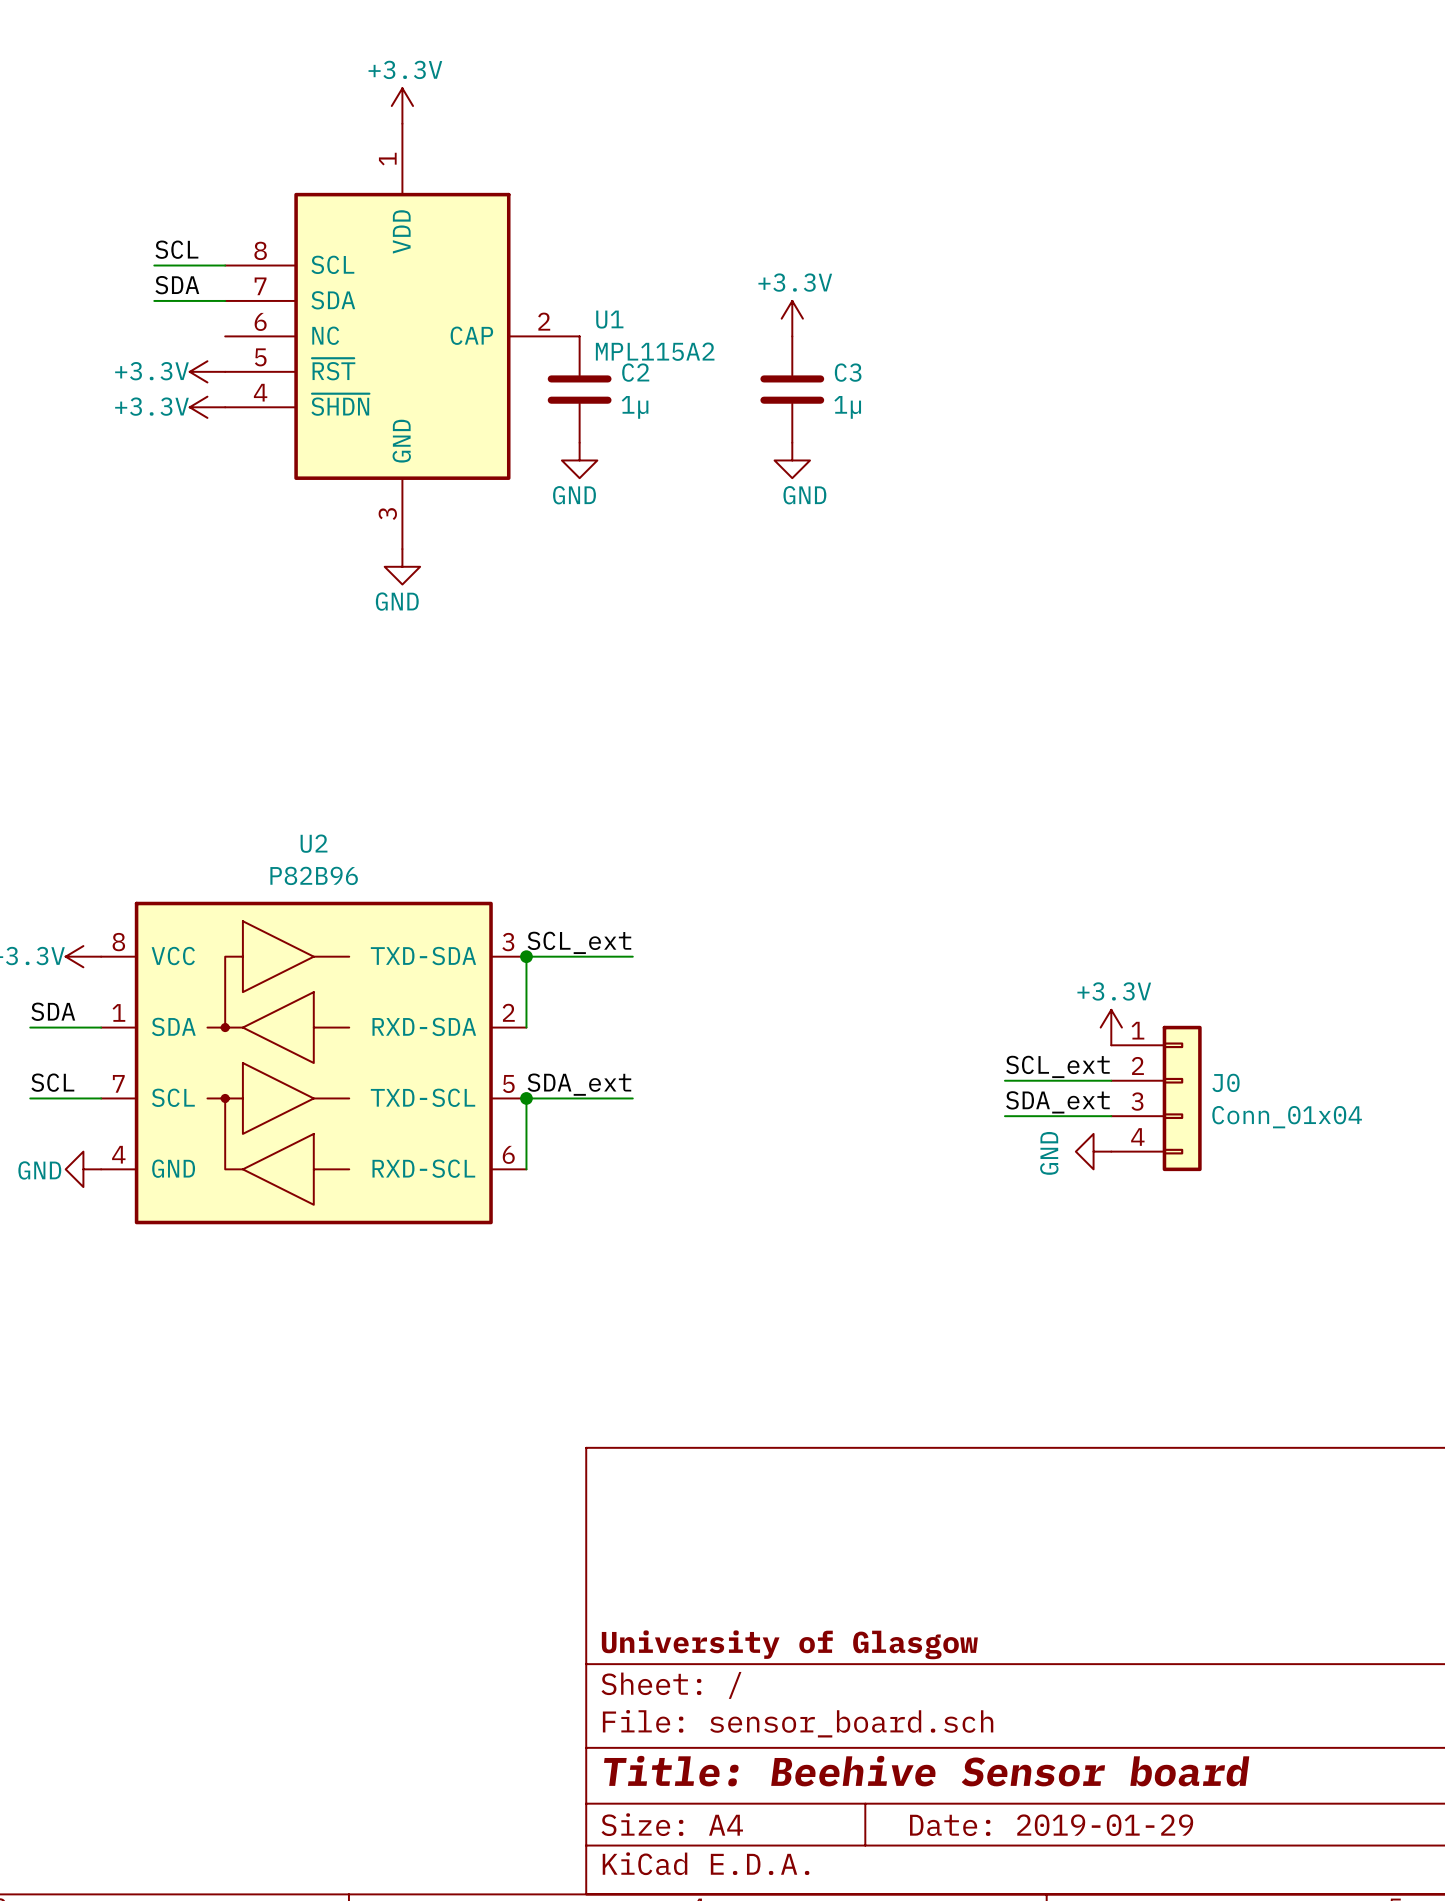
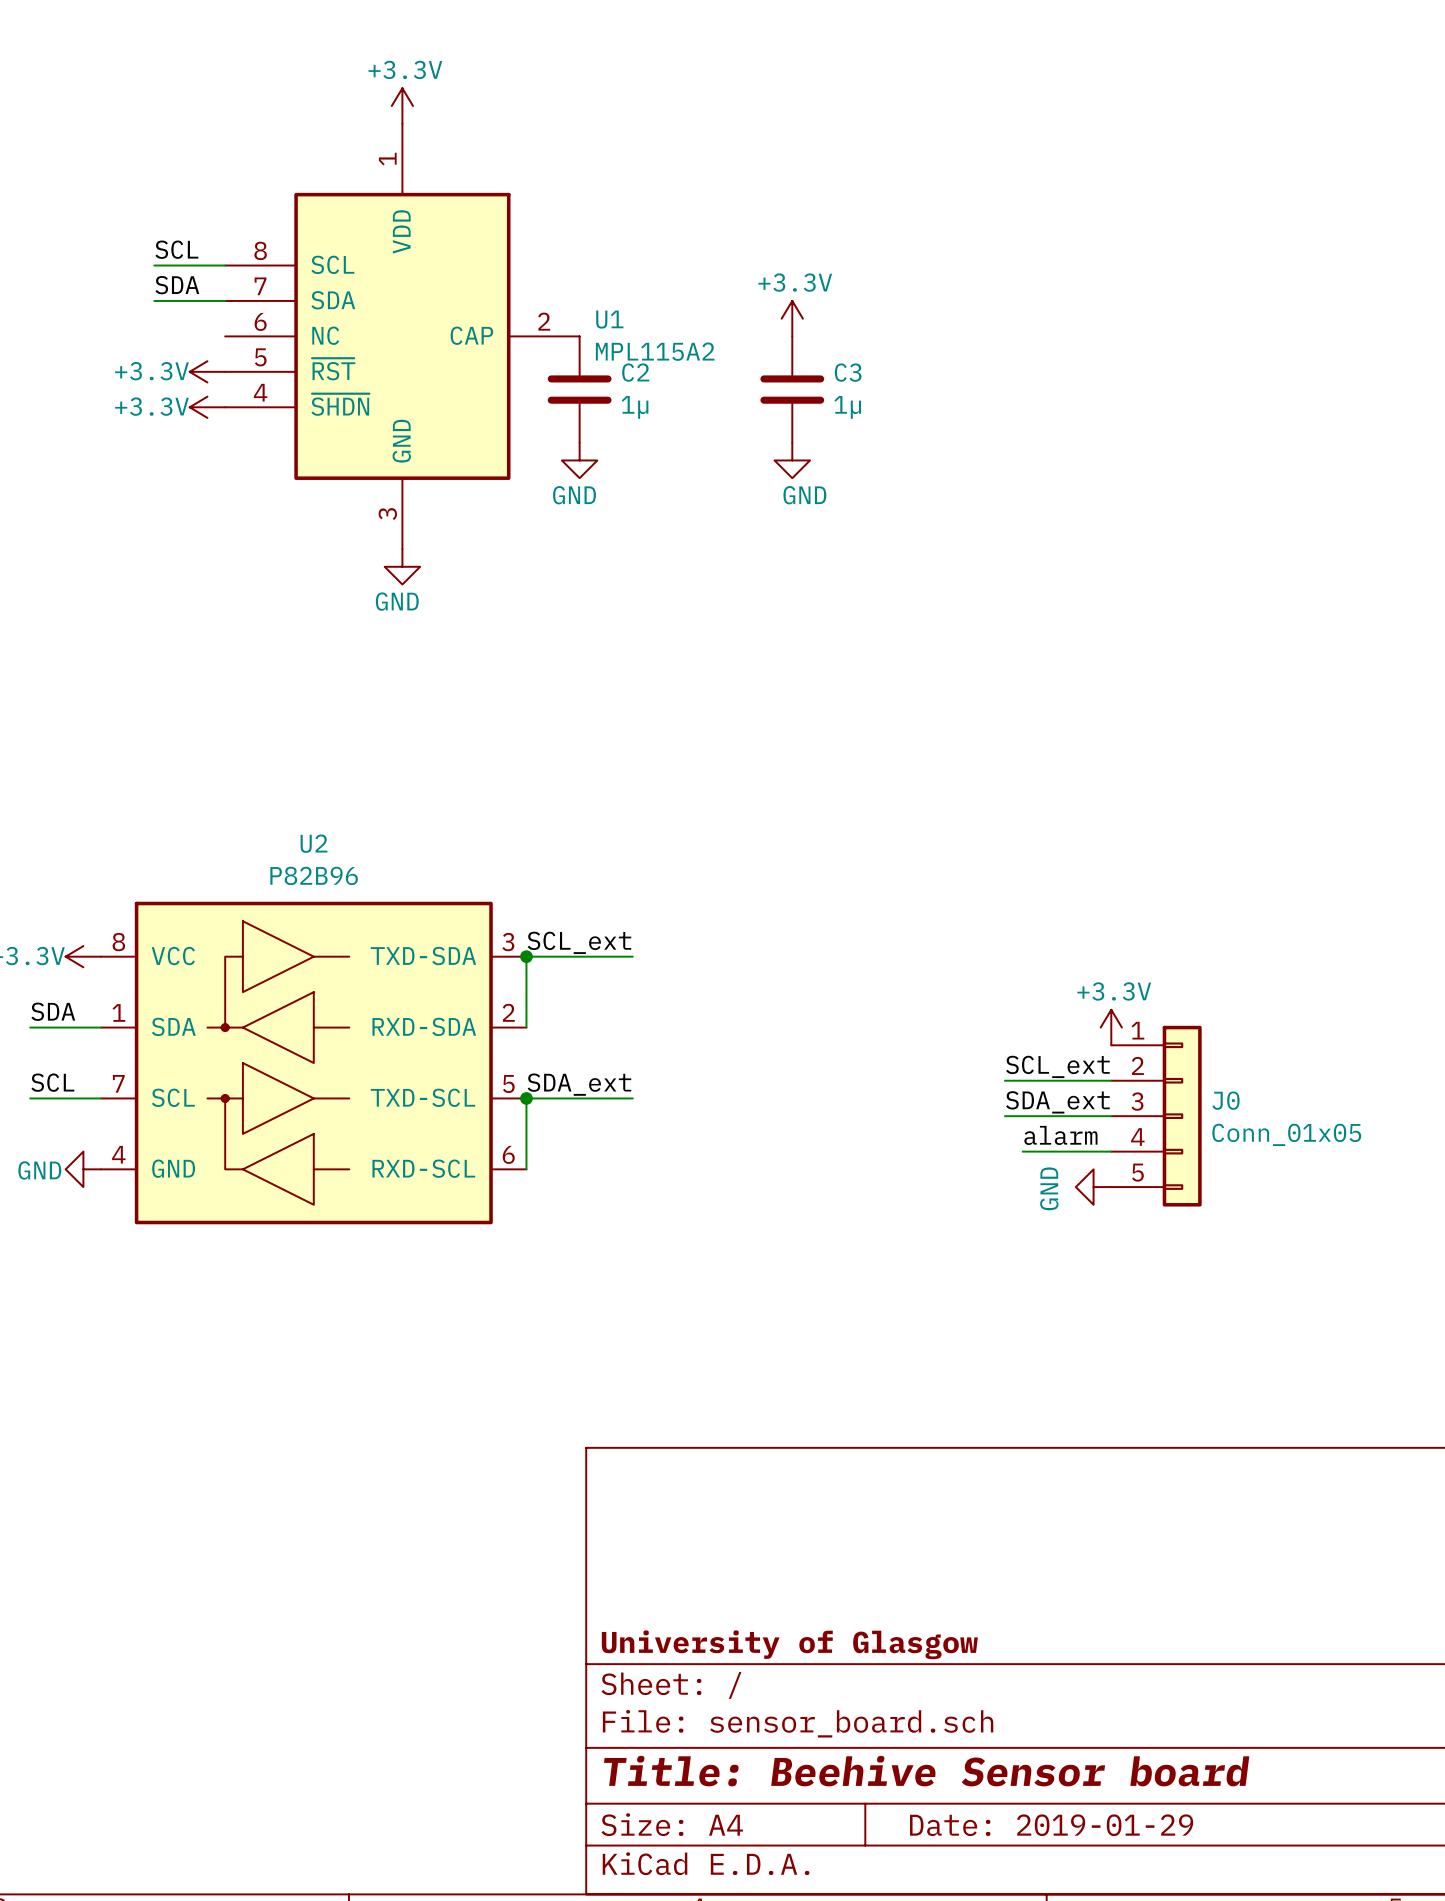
J0 symbol: [1111, 1025, 1202, 1172] -> [1111, 1025, 1202, 1207]
J0 value: Conn_01x04 (1287, 1117) -> Conn_01x05 (1286, 1134)
label: none -> alarm (1060, 1135)
wire: none -> (1022, 1151) (1111, 1151)
power symbol position: GND (1093, 1151) -> GND (1093, 1187)

